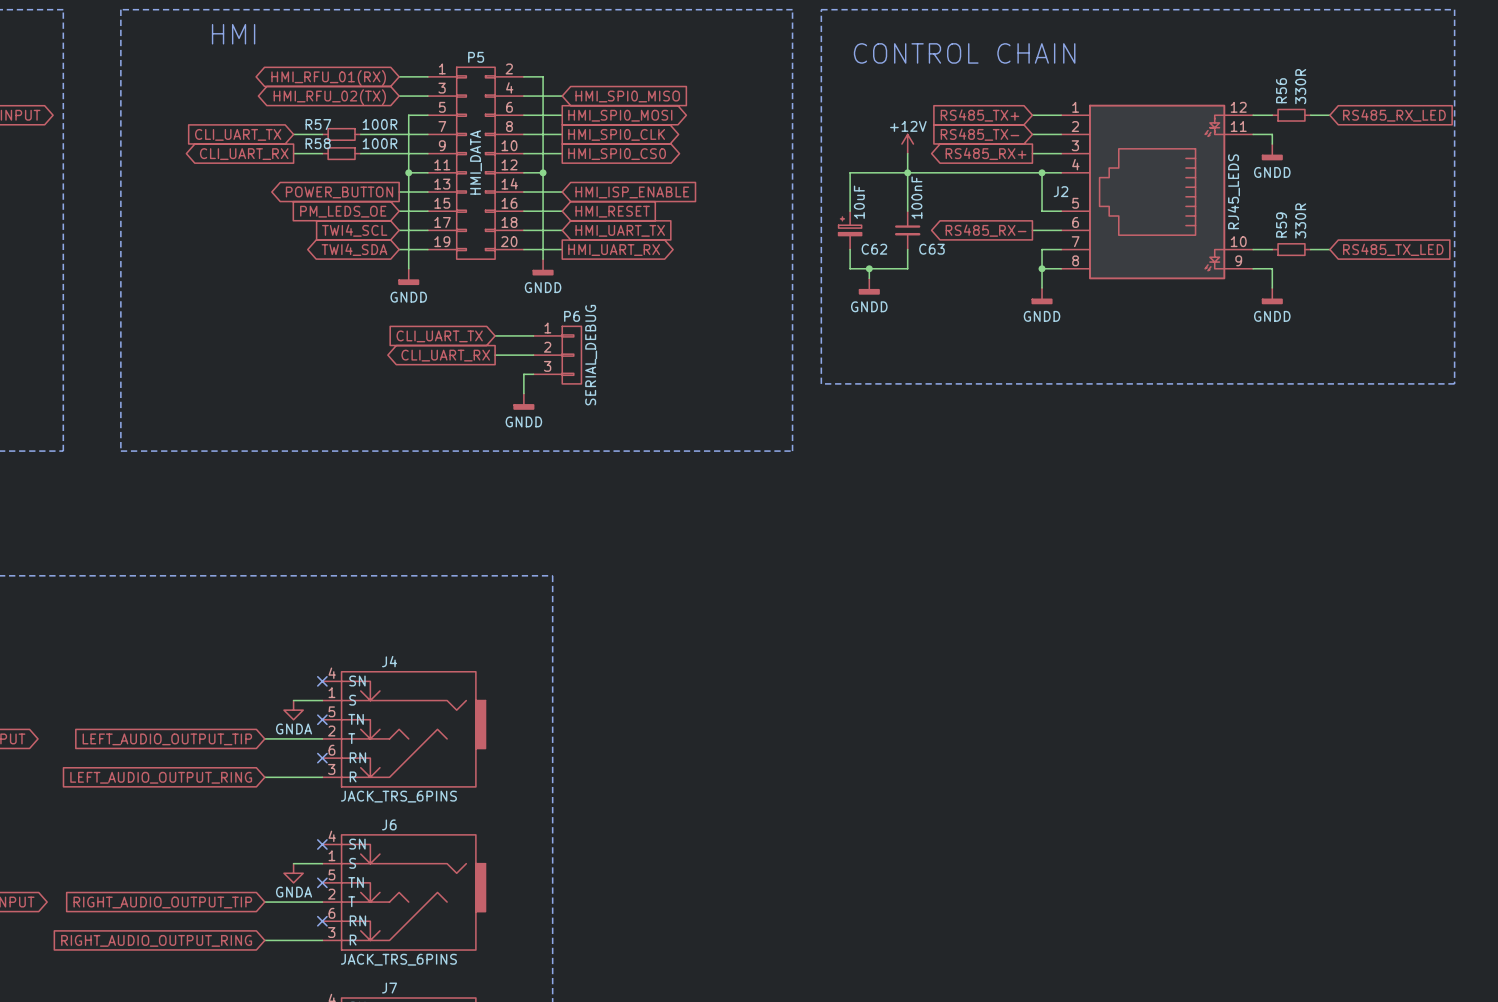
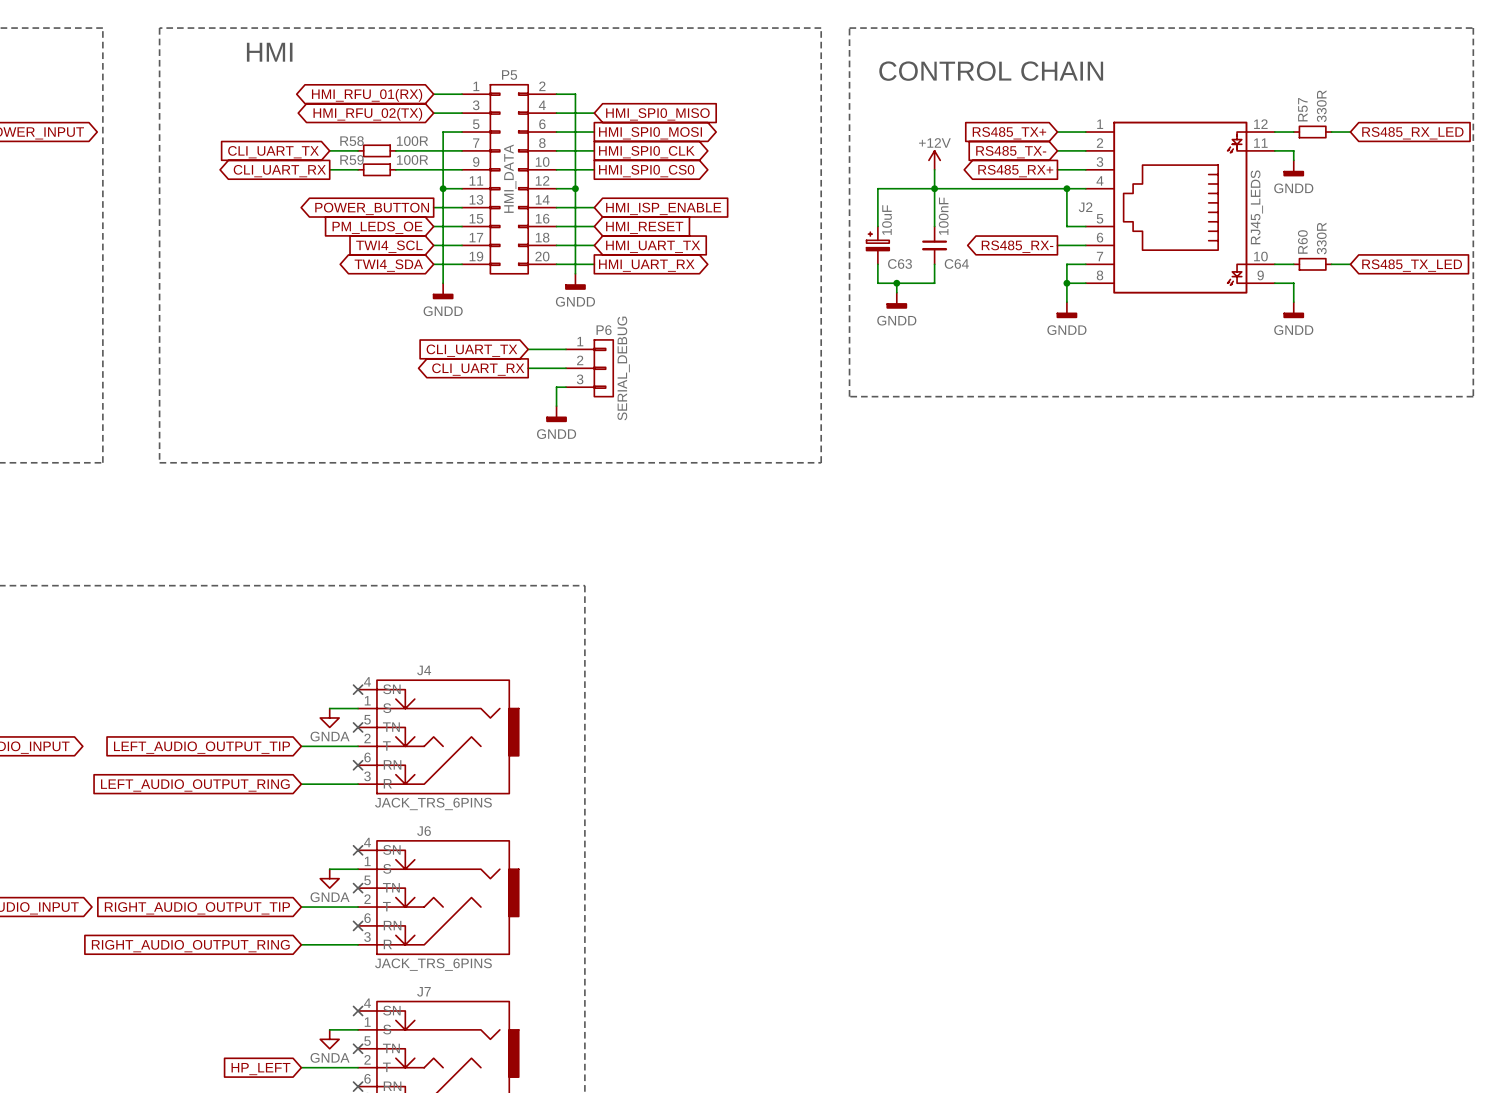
R56 name: R56 (1281, 90) -> R57 (1302, 109)
R57 name: R57 (318, 124) -> R58 (352, 141)
R58 name: R58 (318, 143) -> R59 (352, 160)
R59 name: R59 (1281, 225) -> R60 (1302, 241)
C62 name: C62 (874, 249) -> C63 (899, 263)
C63 name: C63 (931, 249) -> C64 (956, 263)

